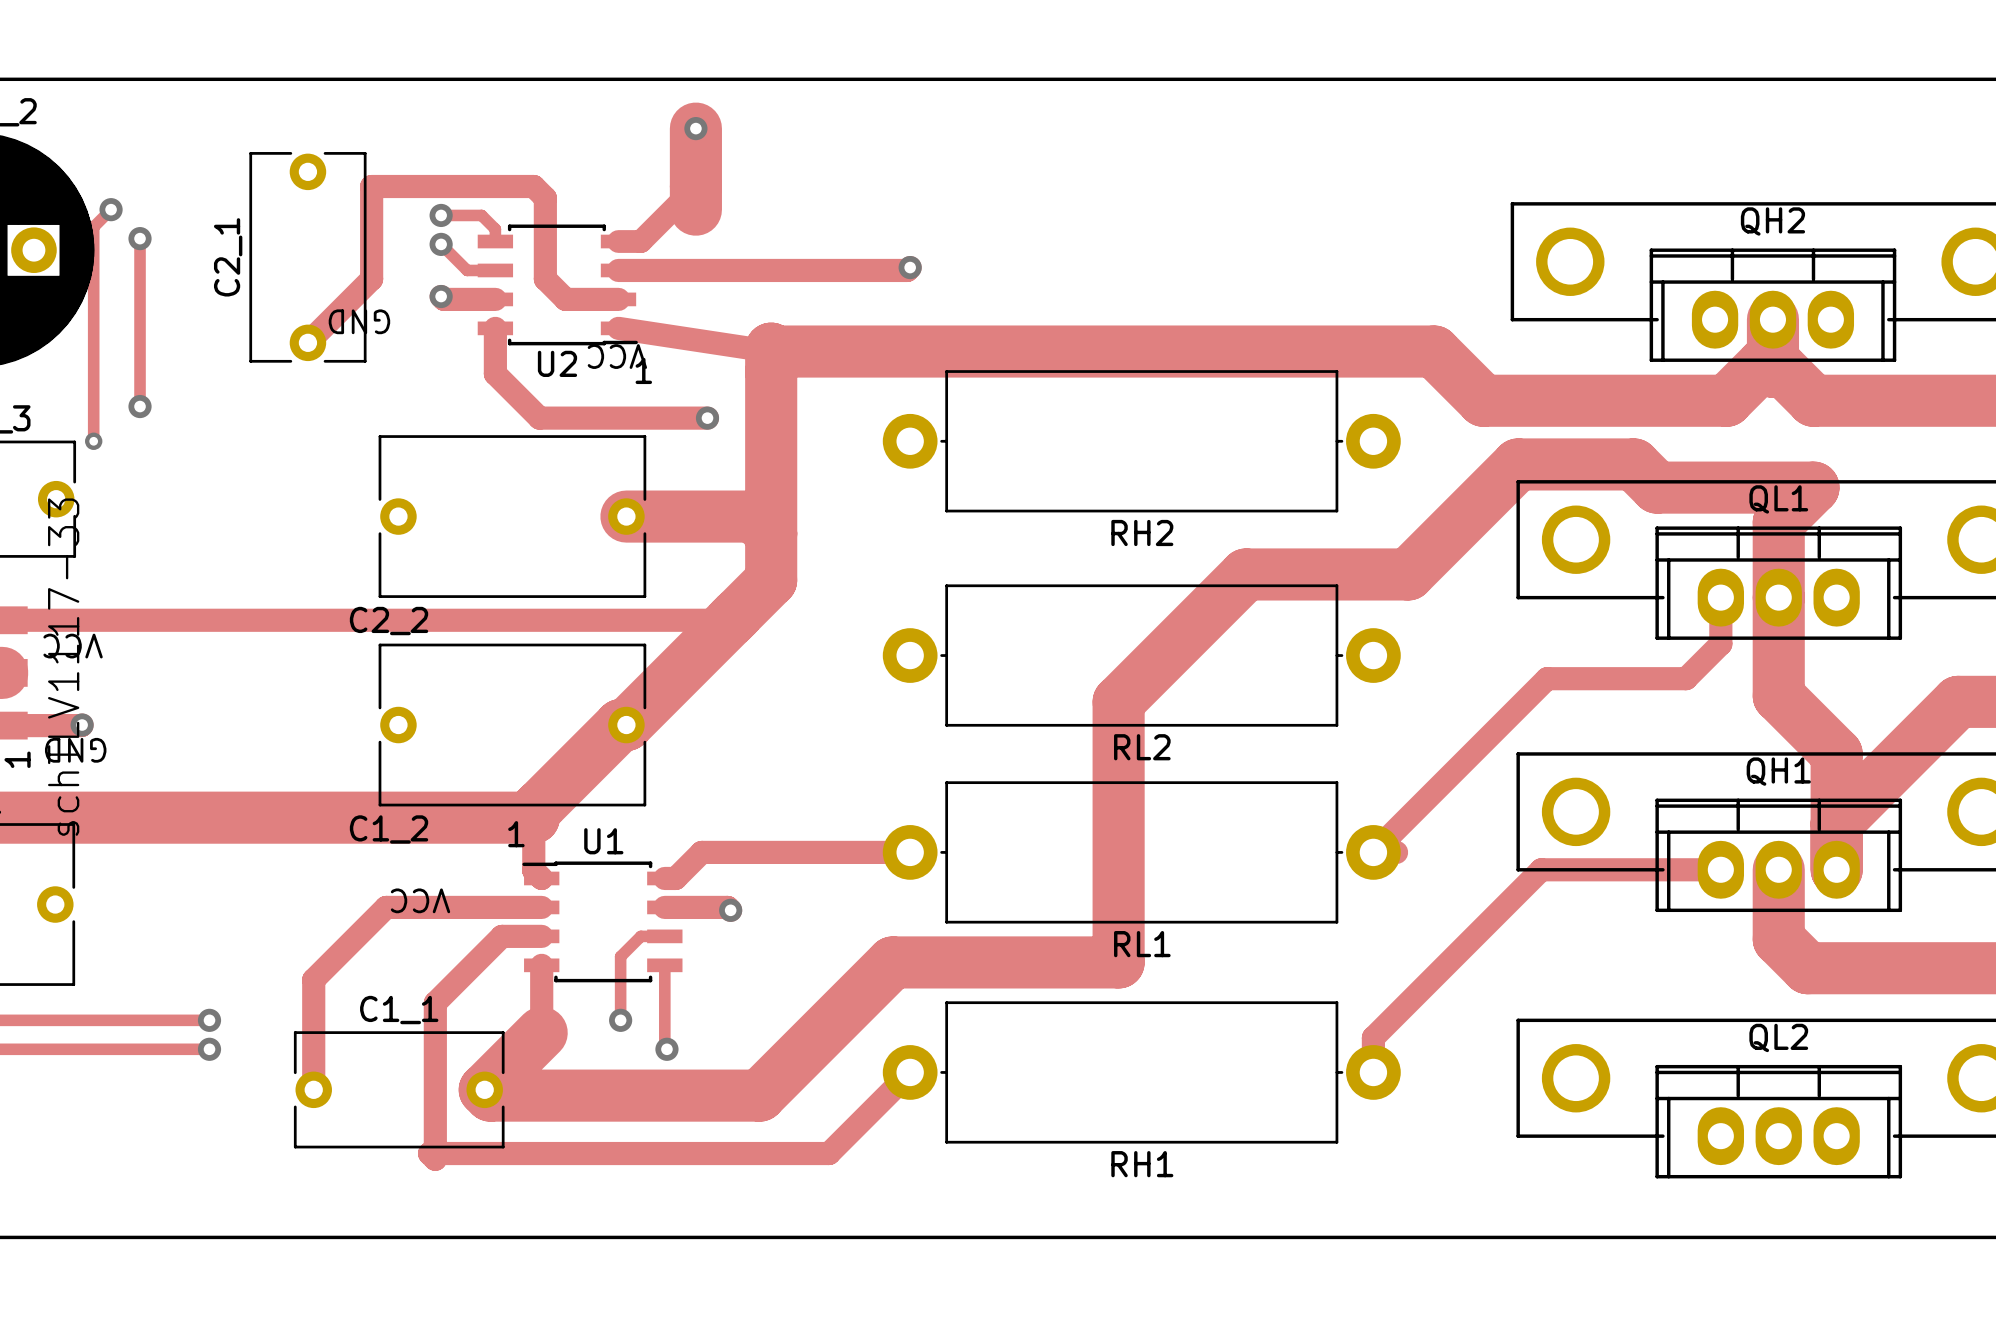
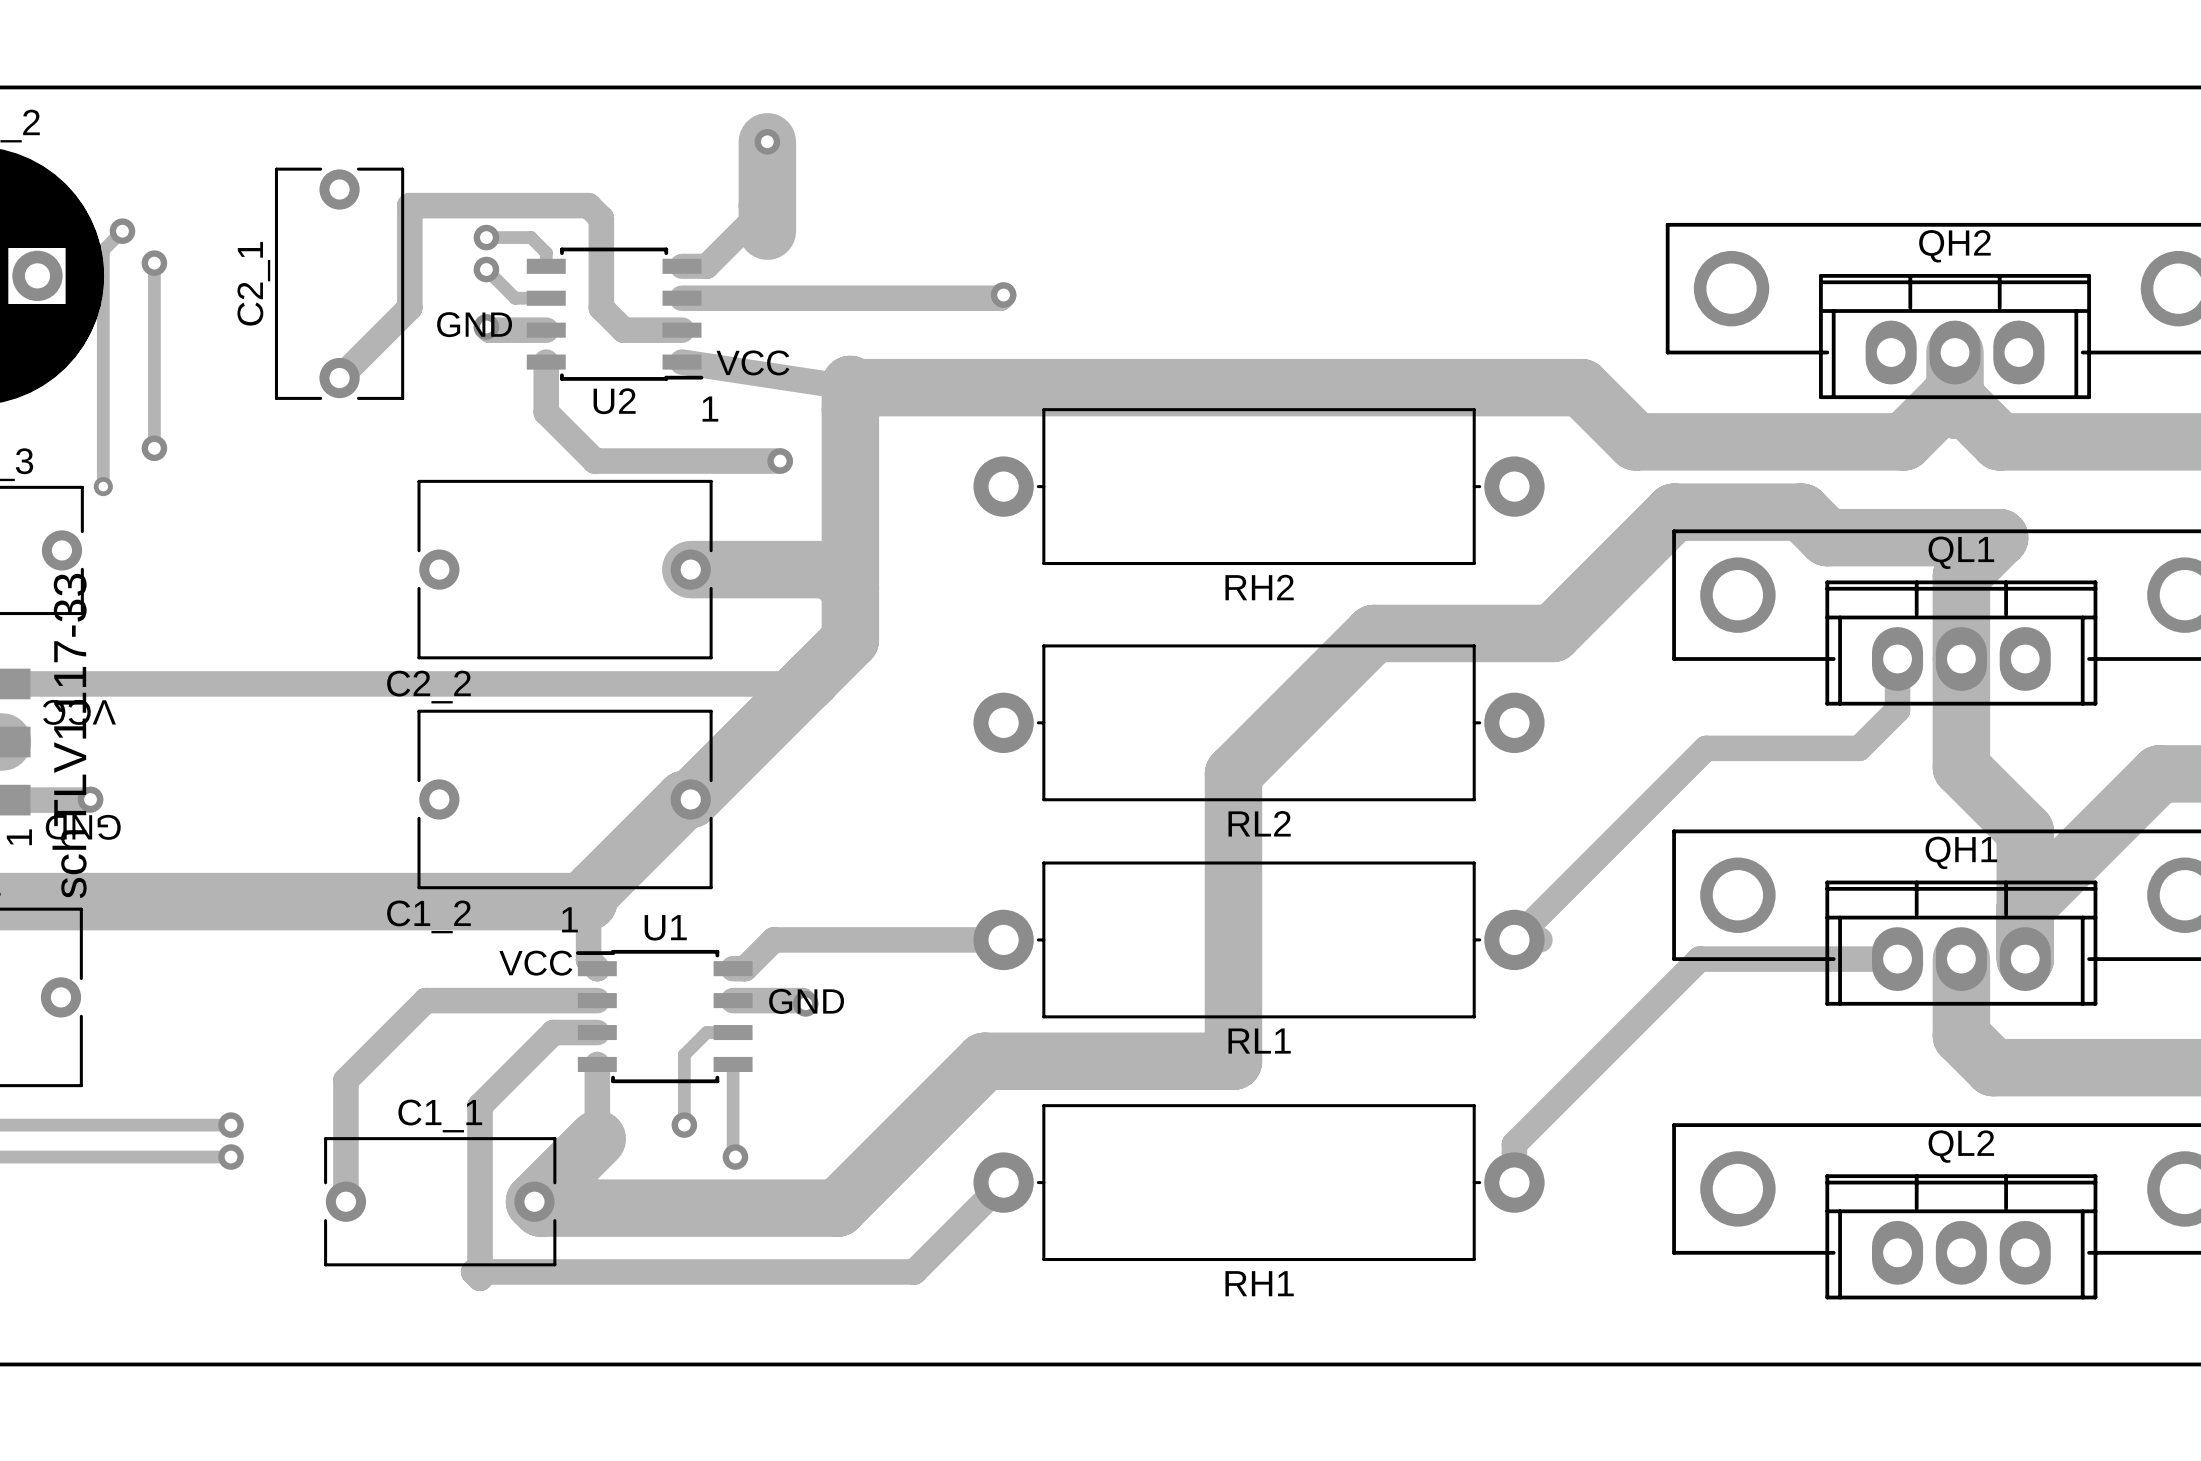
text rotation: 0° (359, 321) -> 180° (474, 324)
text position: GND (359, 321) -> GND (474, 324)
text rotation: 0° (617, 356) -> 180° (752, 362)
text position: VCC (617, 356) -> VCC (752, 362)
text rotation: 0° (420, 900) -> 180° (535, 963)
text position: VCC (420, 900) -> VCC (535, 963)
text: none -> GND (806, 1001)

